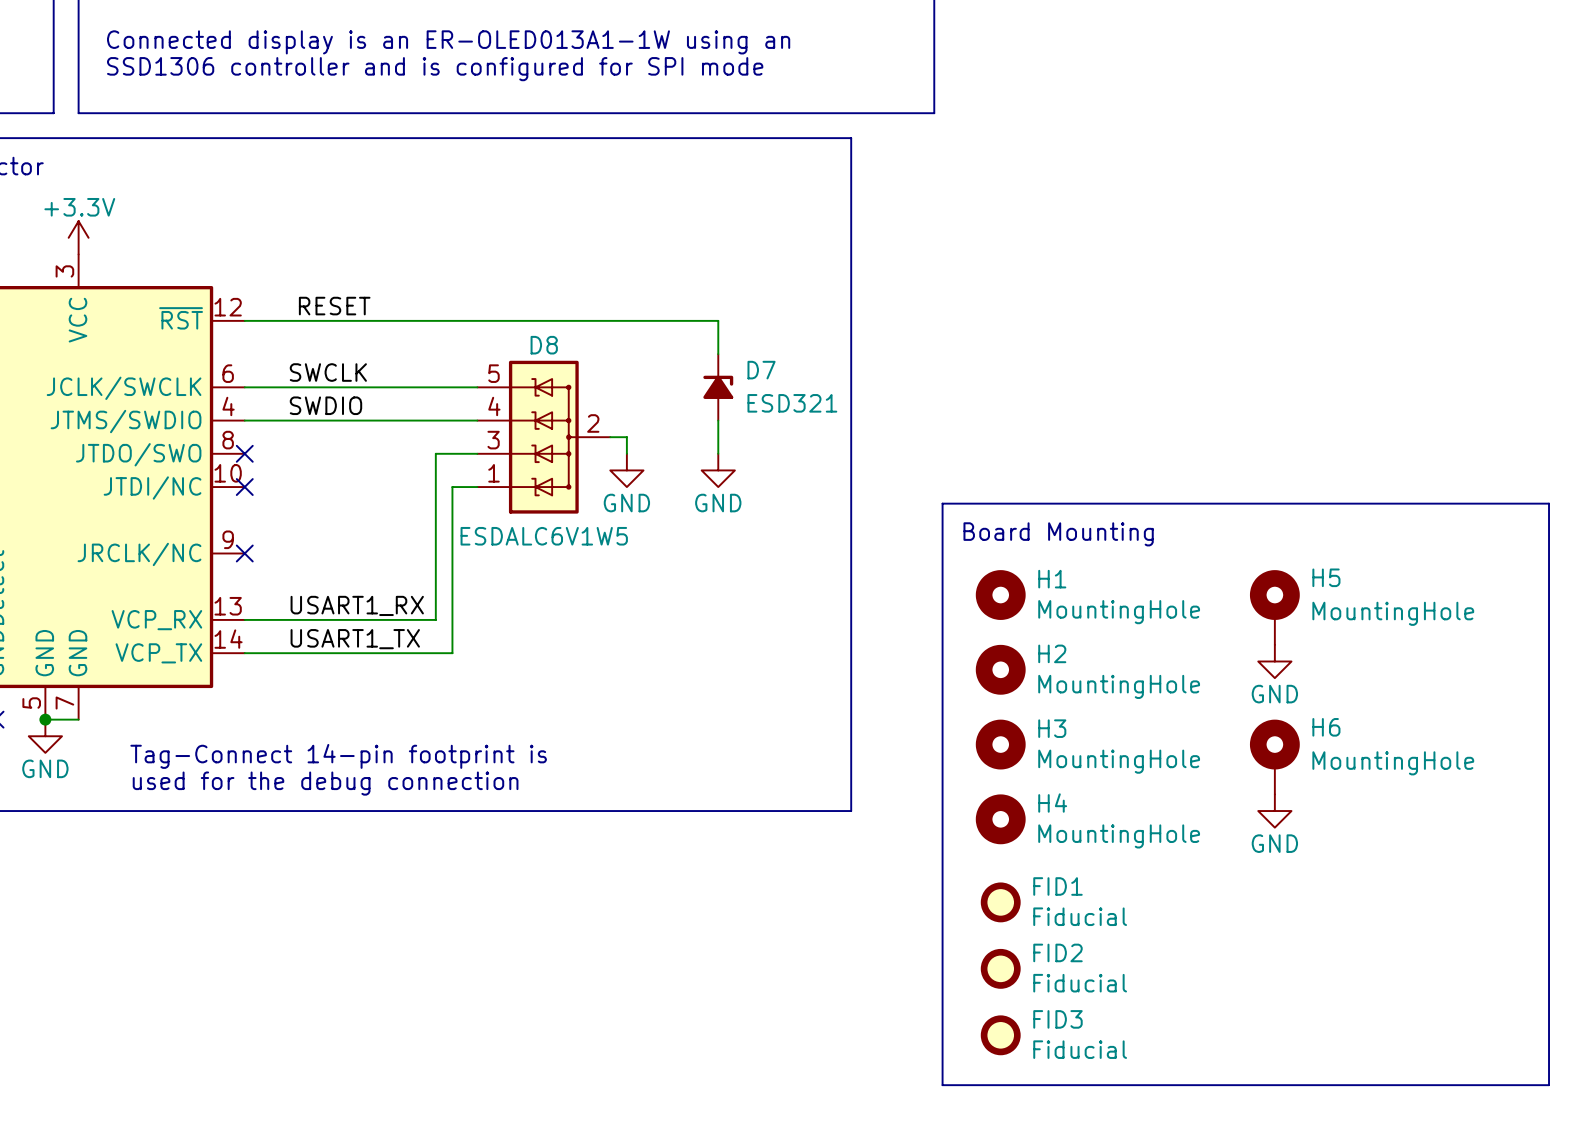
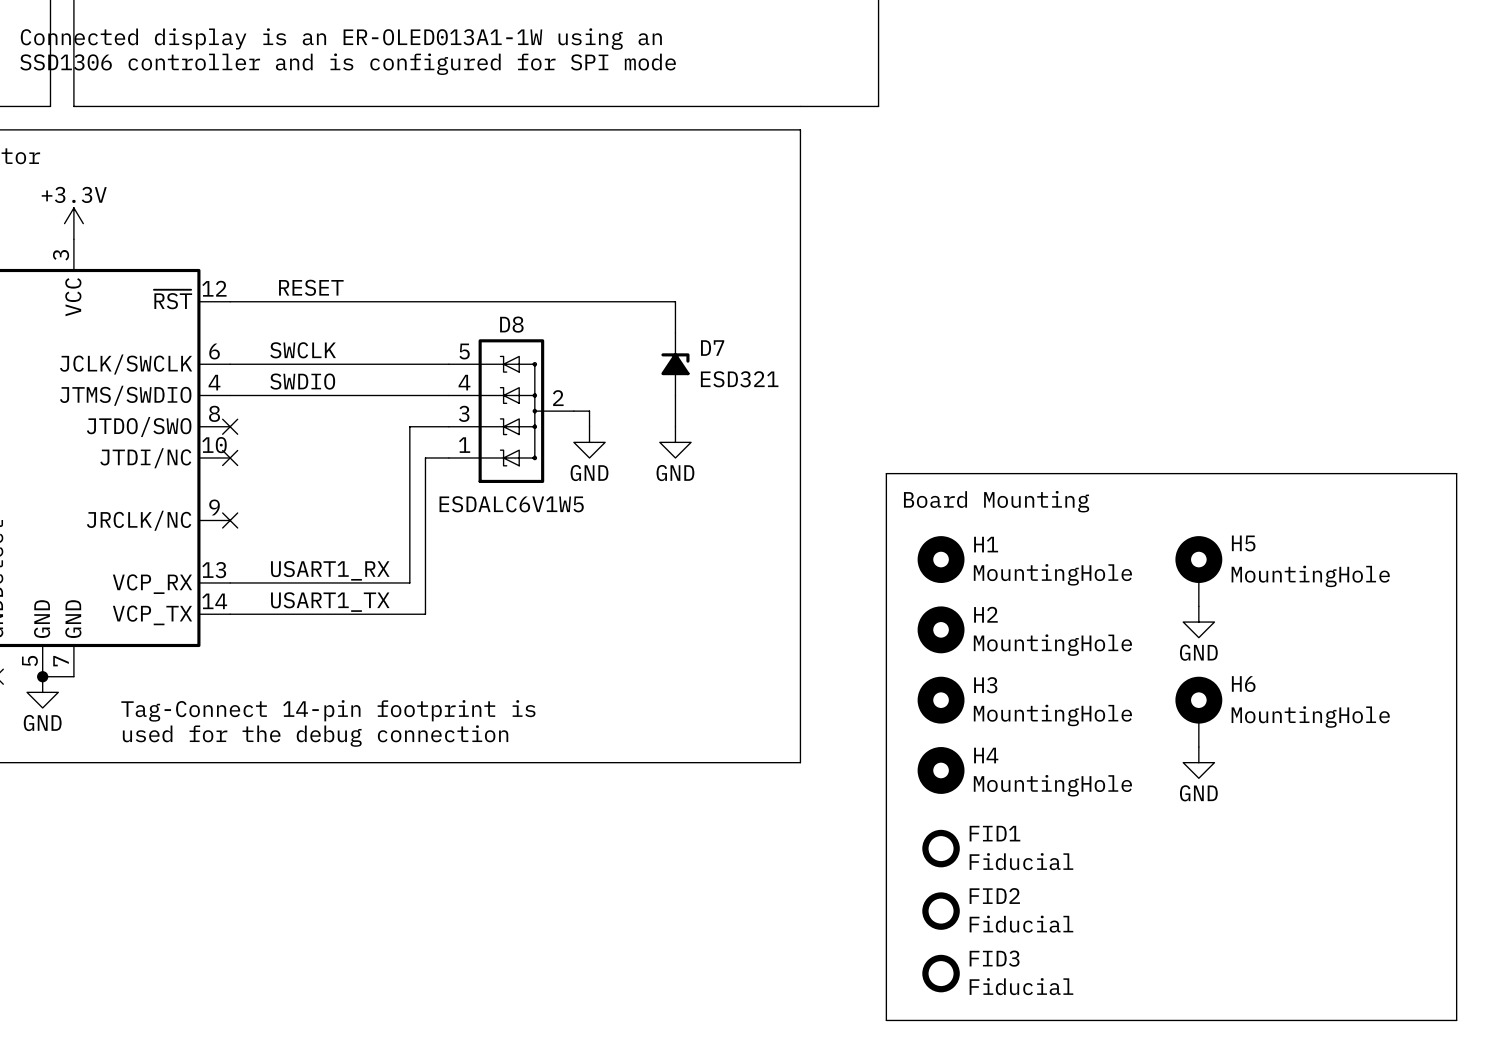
text position: Connected display is an ER-OLED013A1-1W using an (448, 42) -> Connected display is an ER-OLED013A1-1W using an (341, 39)
text position: SSD1306 controller and is configured for SPI mode (435, 69) -> SSD1306 controller and is configured for SPI mode (348, 64)

